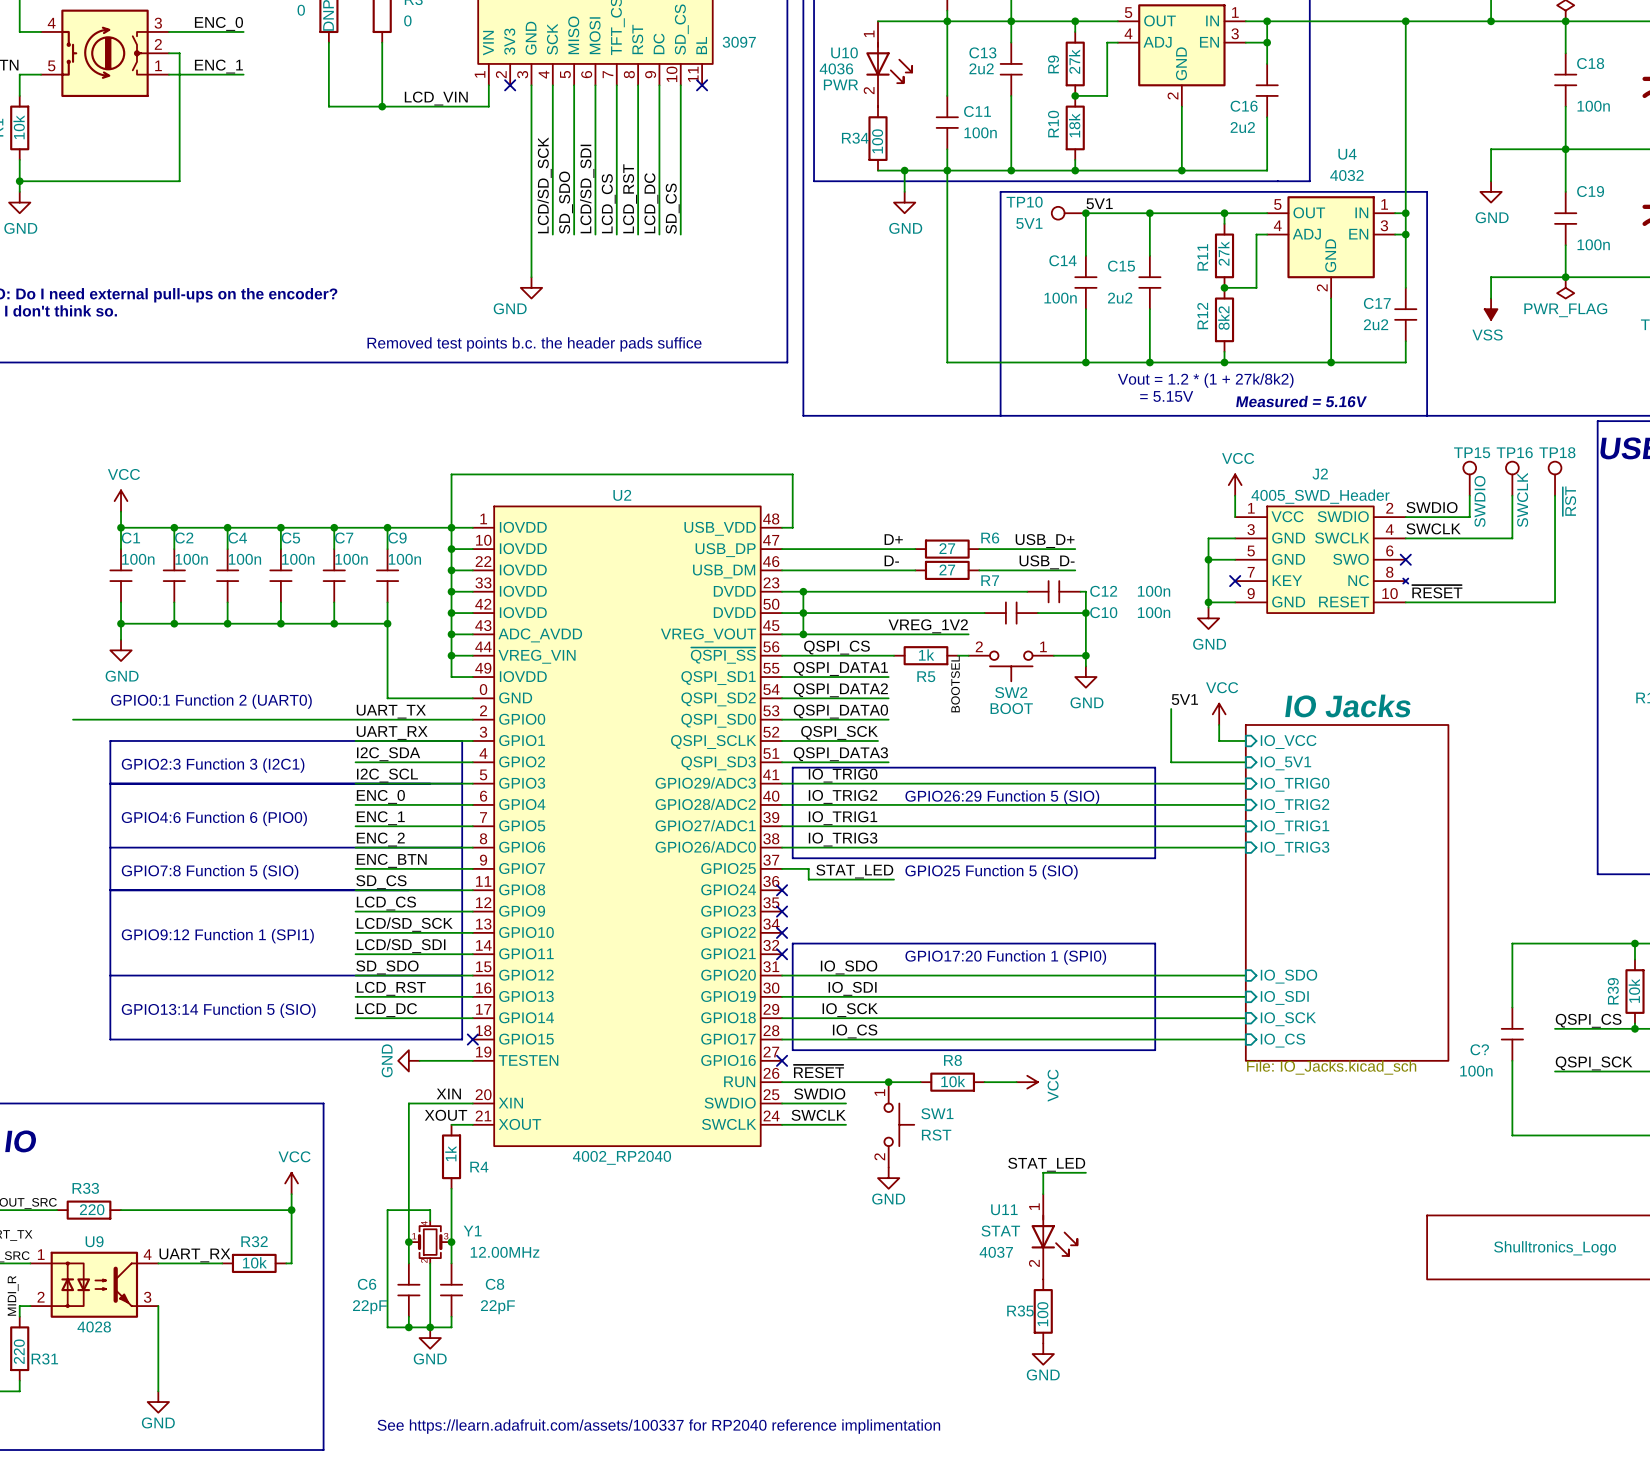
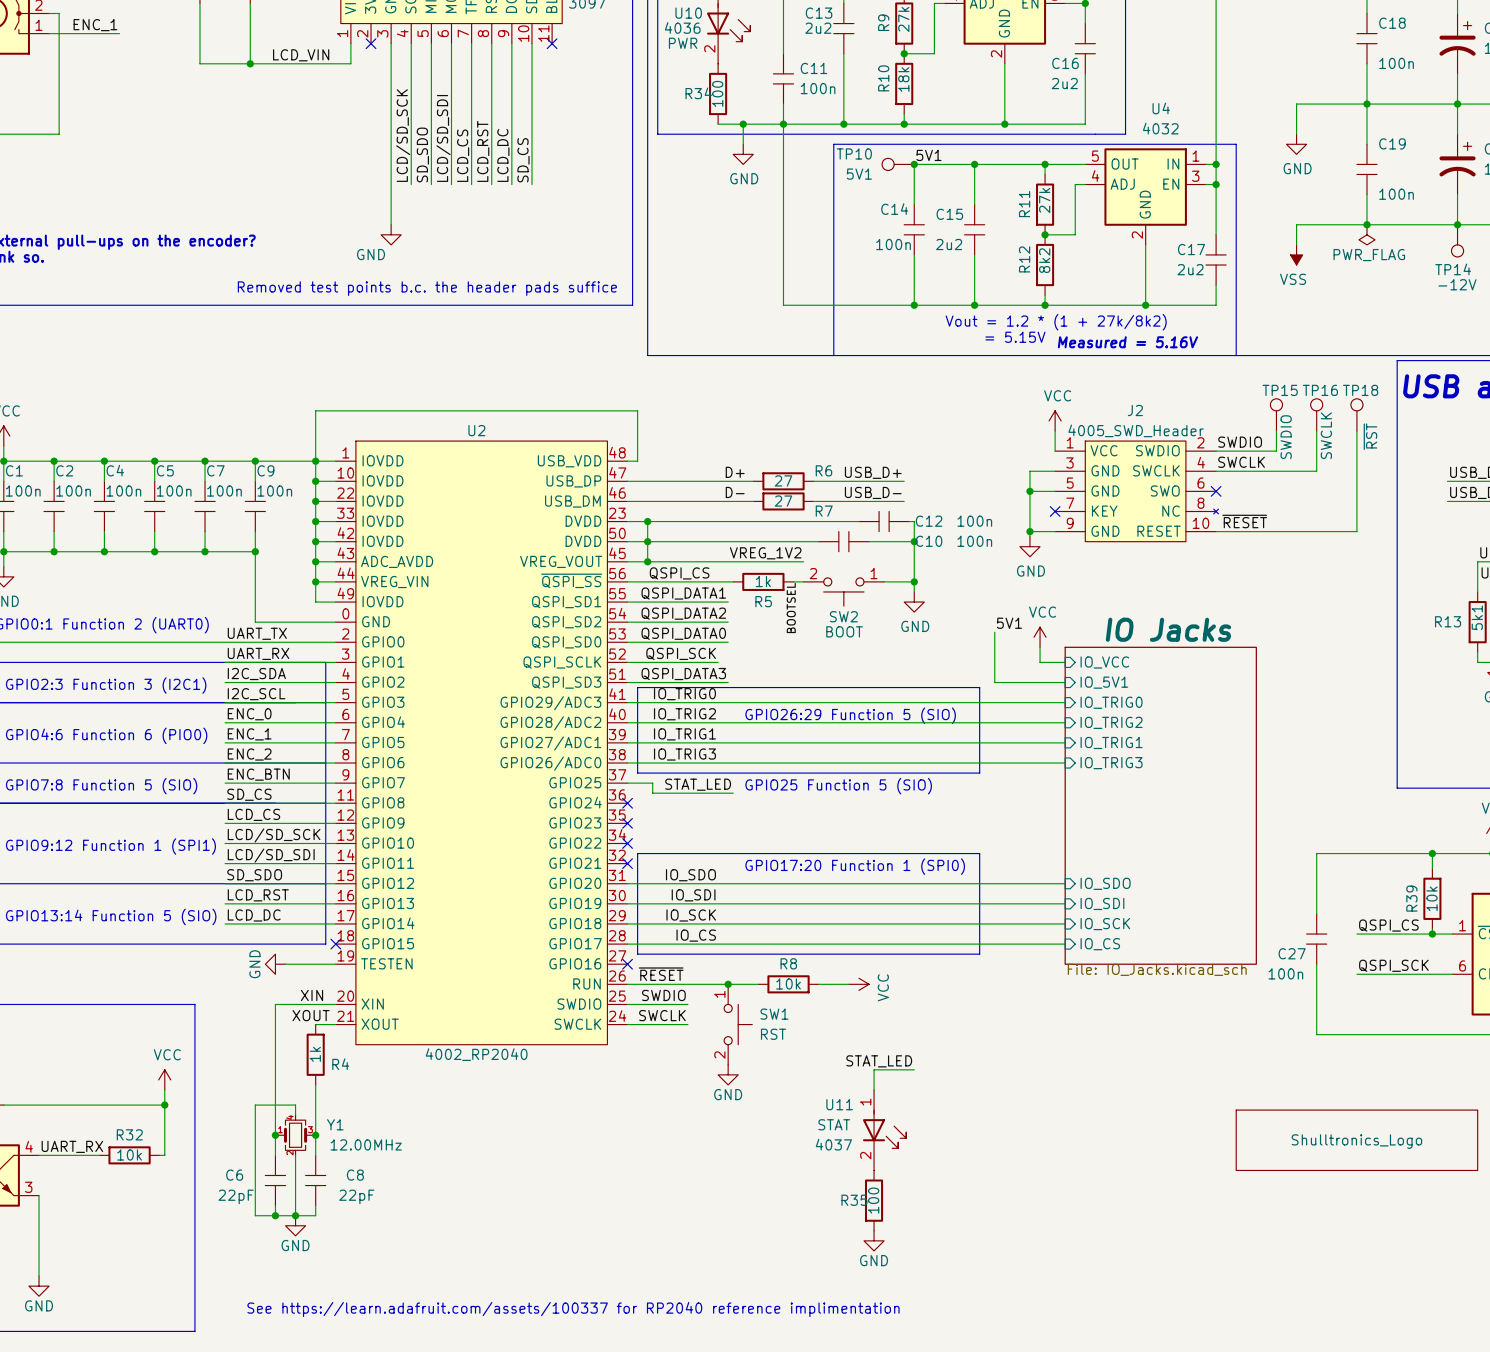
C? name: C? (1479, 1049) -> C27 (1292, 953)

